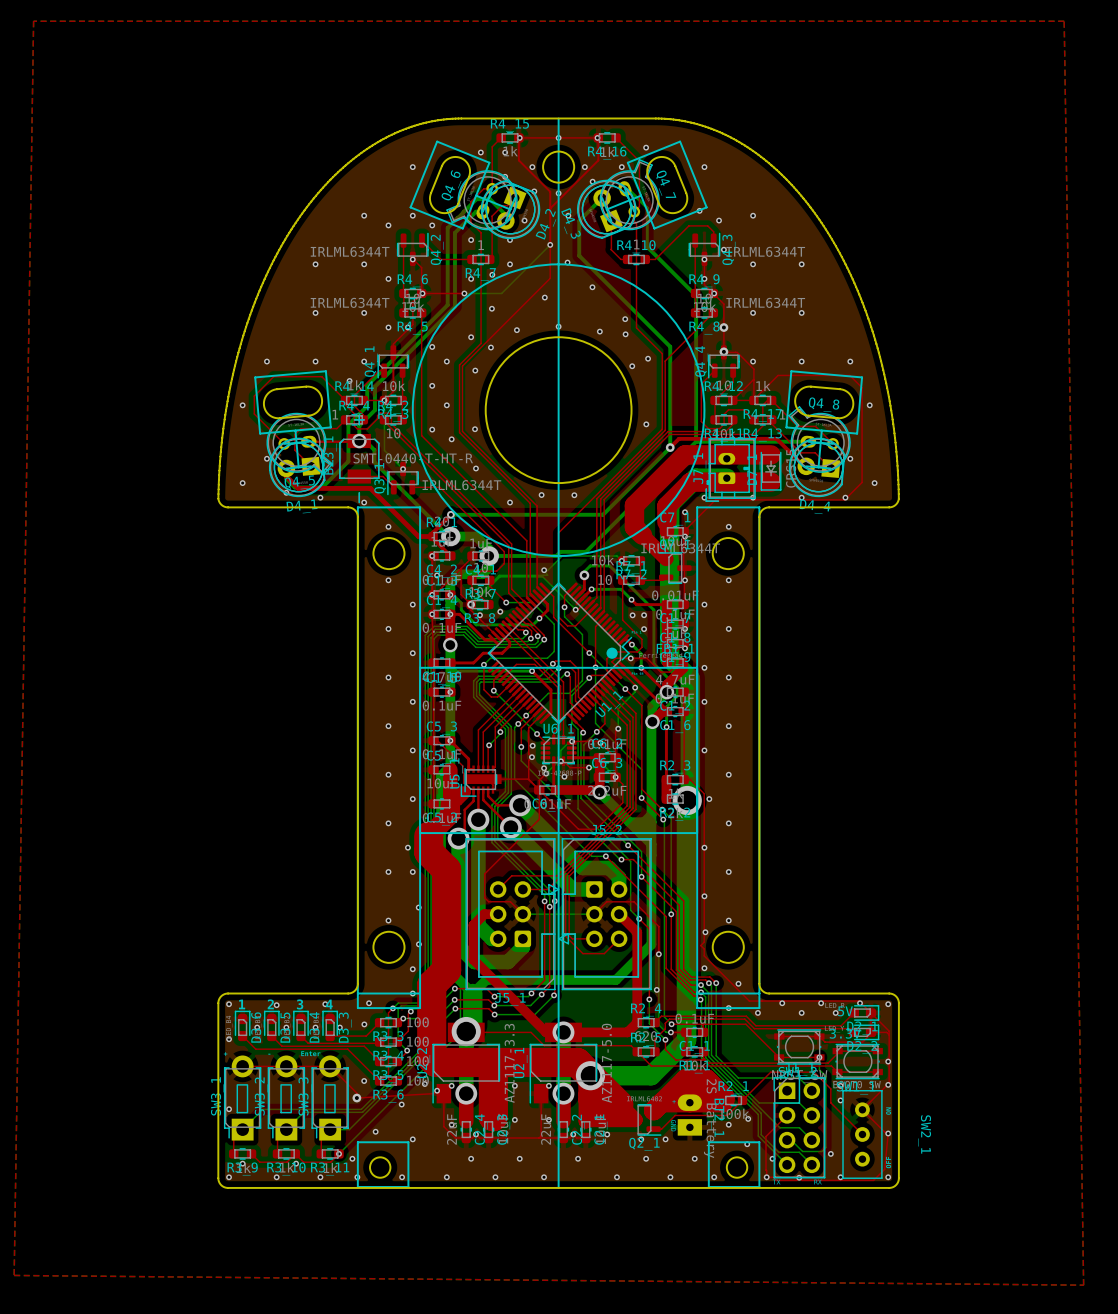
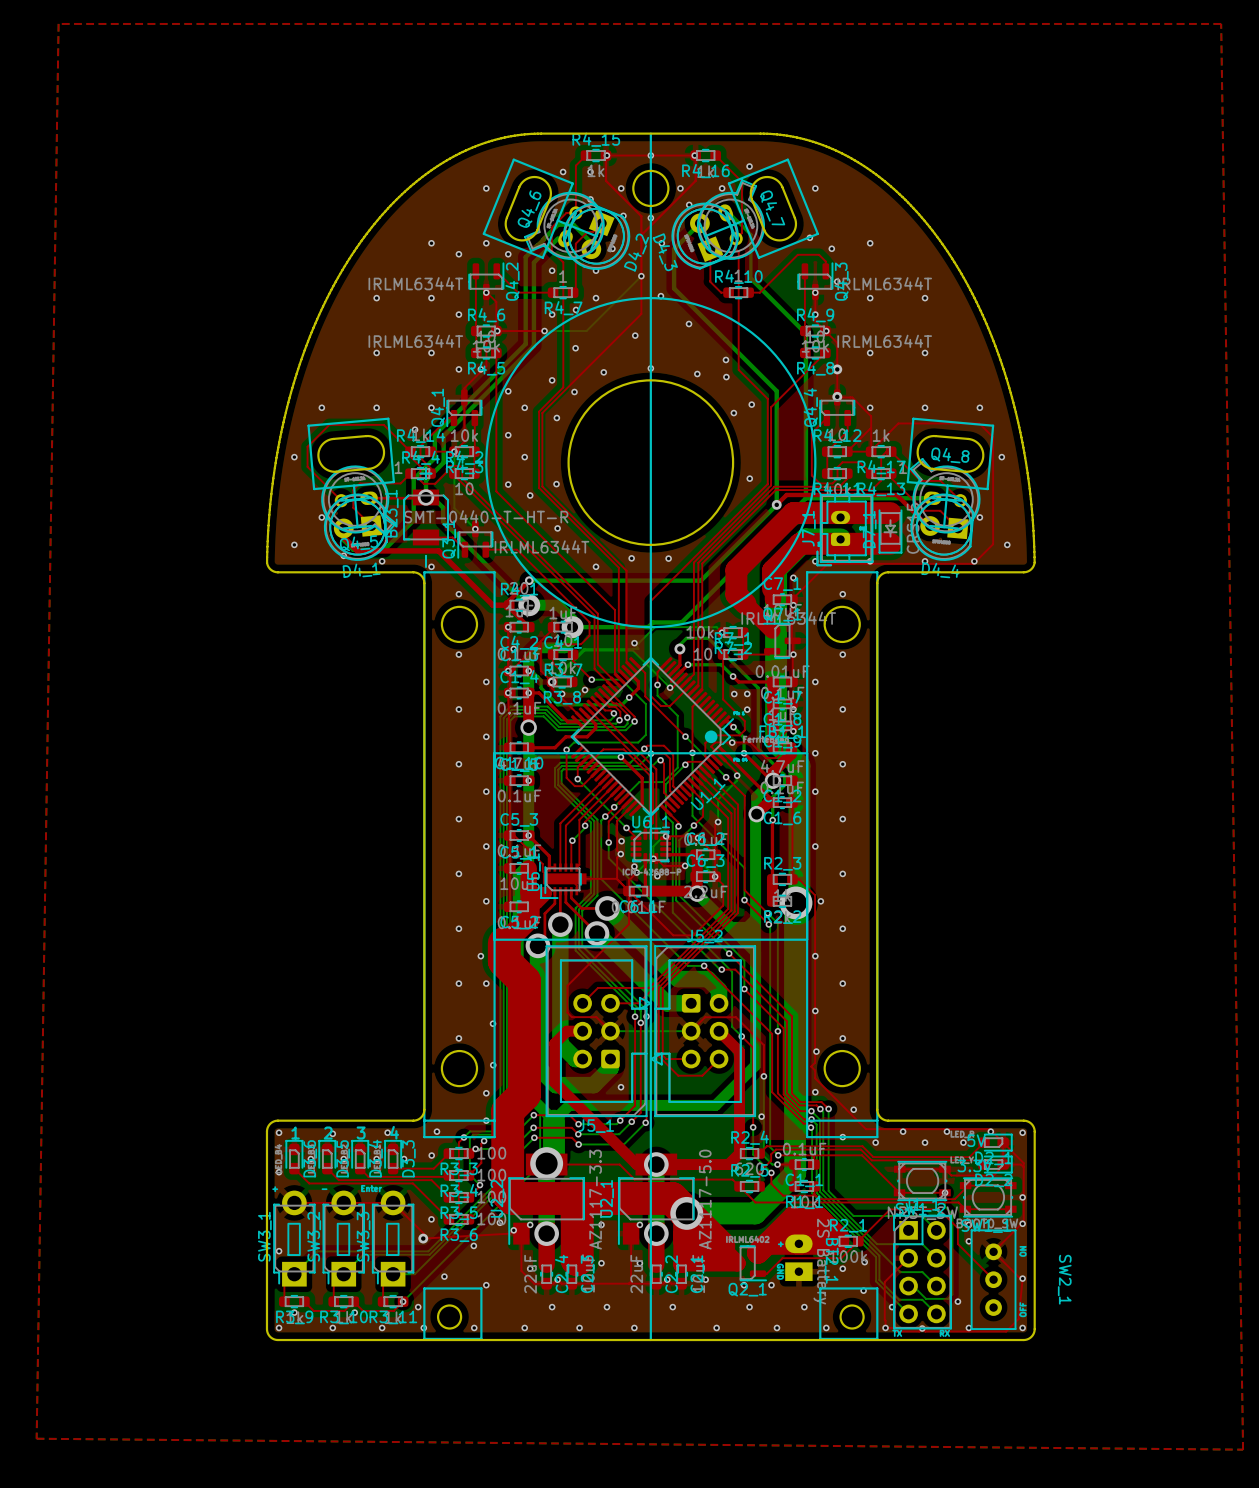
via: none -> (621, 1087)

